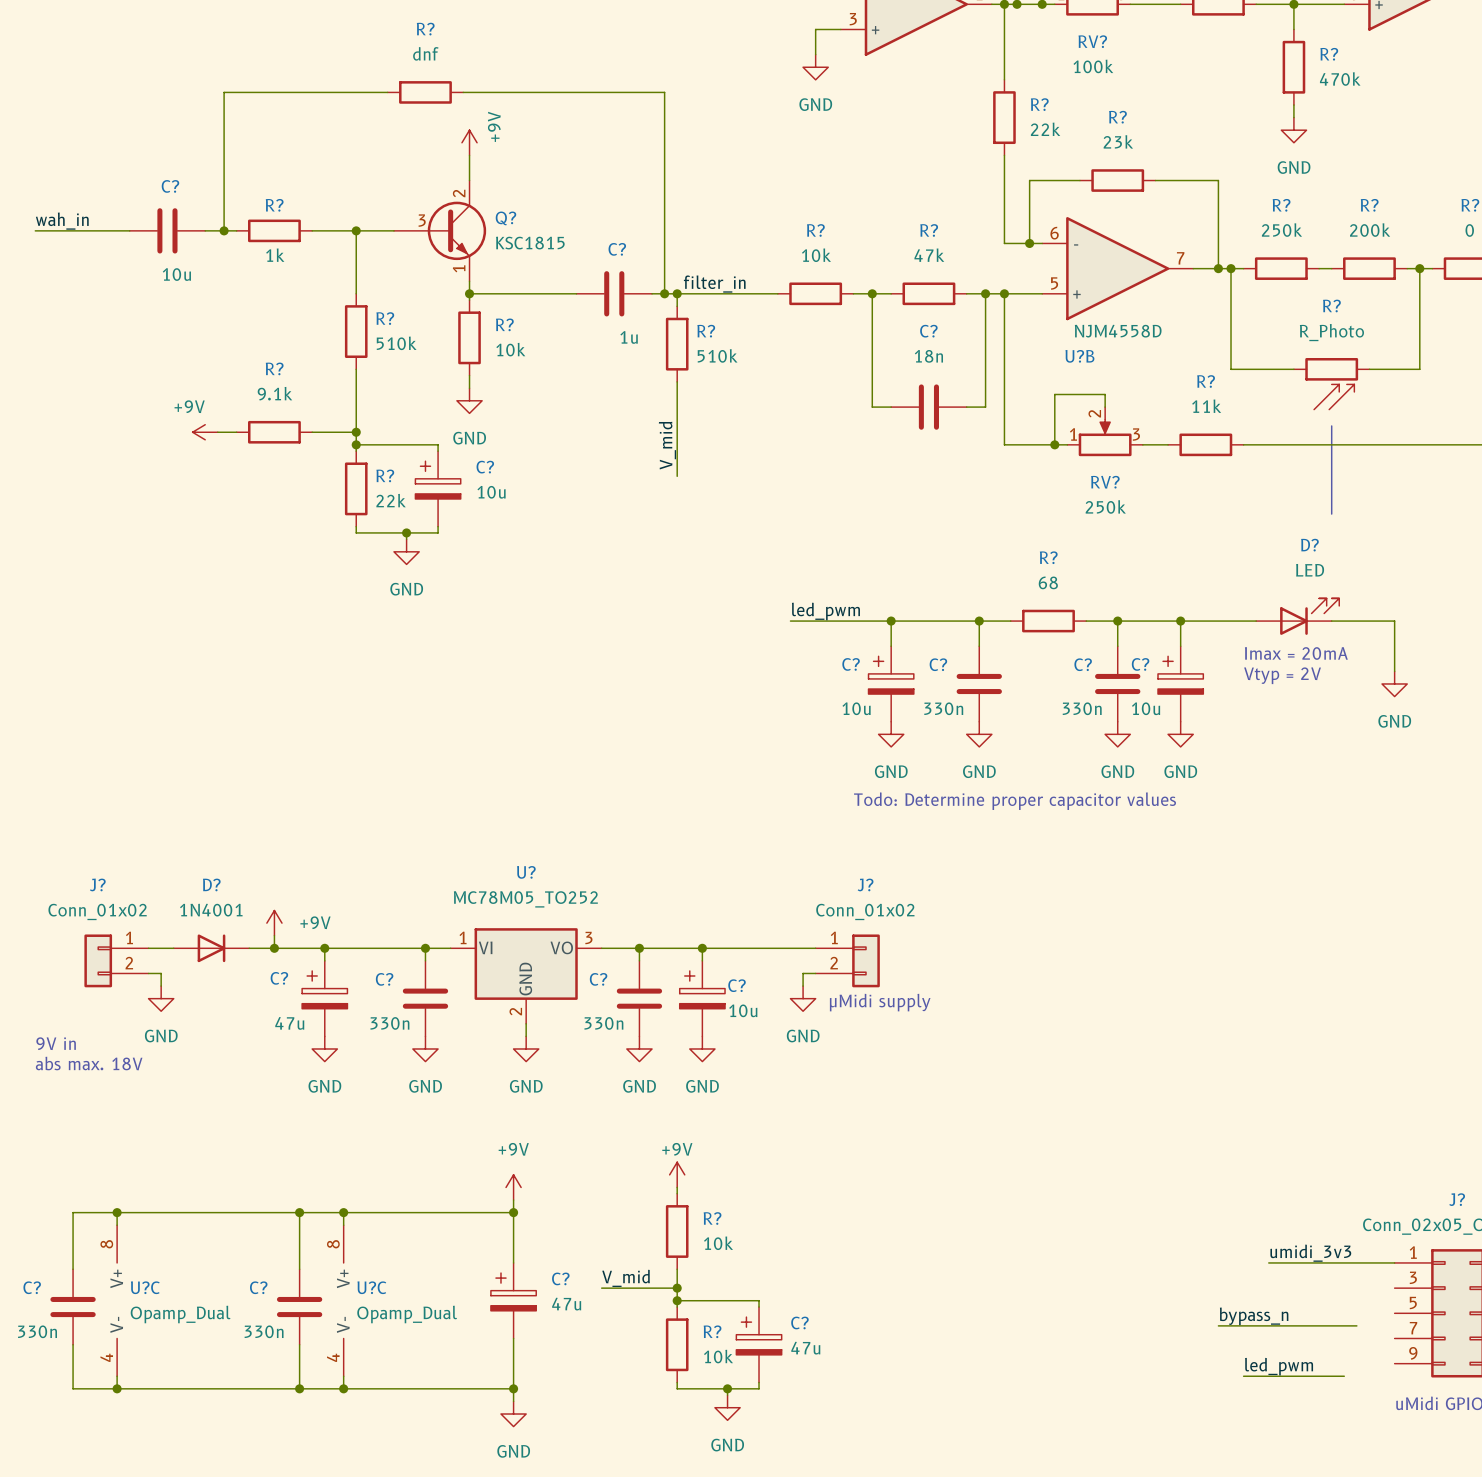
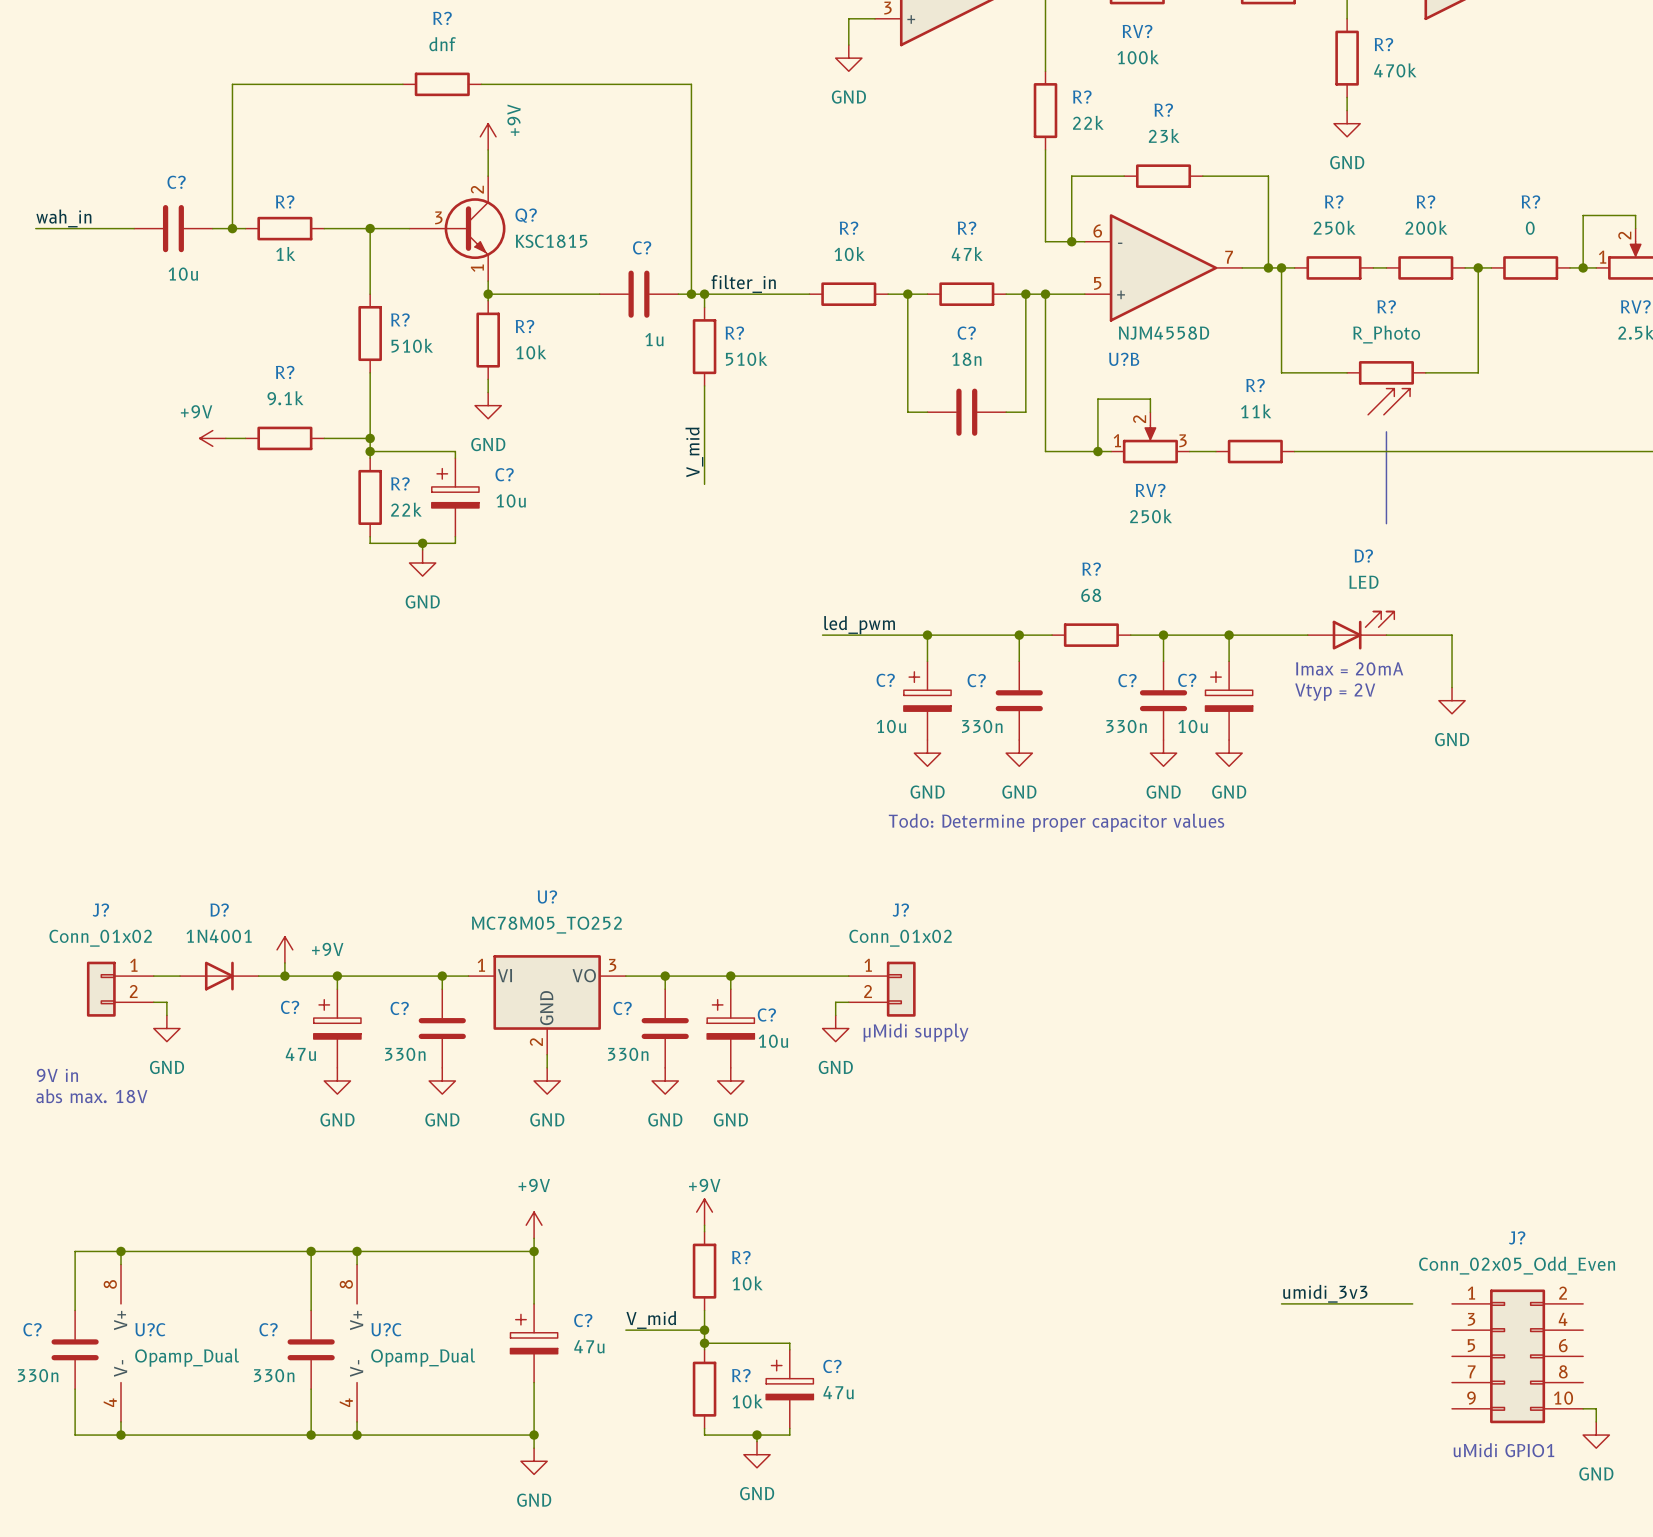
label position: umidi_3v3 (1310, 1253) -> umidi_3v3 (1325, 1293)
wire: (1356, 1262) (1394, 1262) -> (1281, 1303) (1320, 1303)
label: bypass_n (1254, 1316) -> none
wire: (1218, 1325) (1356, 1325) -> none
label: led_pwm (1279, 1366) -> none
wire: (1243, 1376) (1344, 1376) -> none

